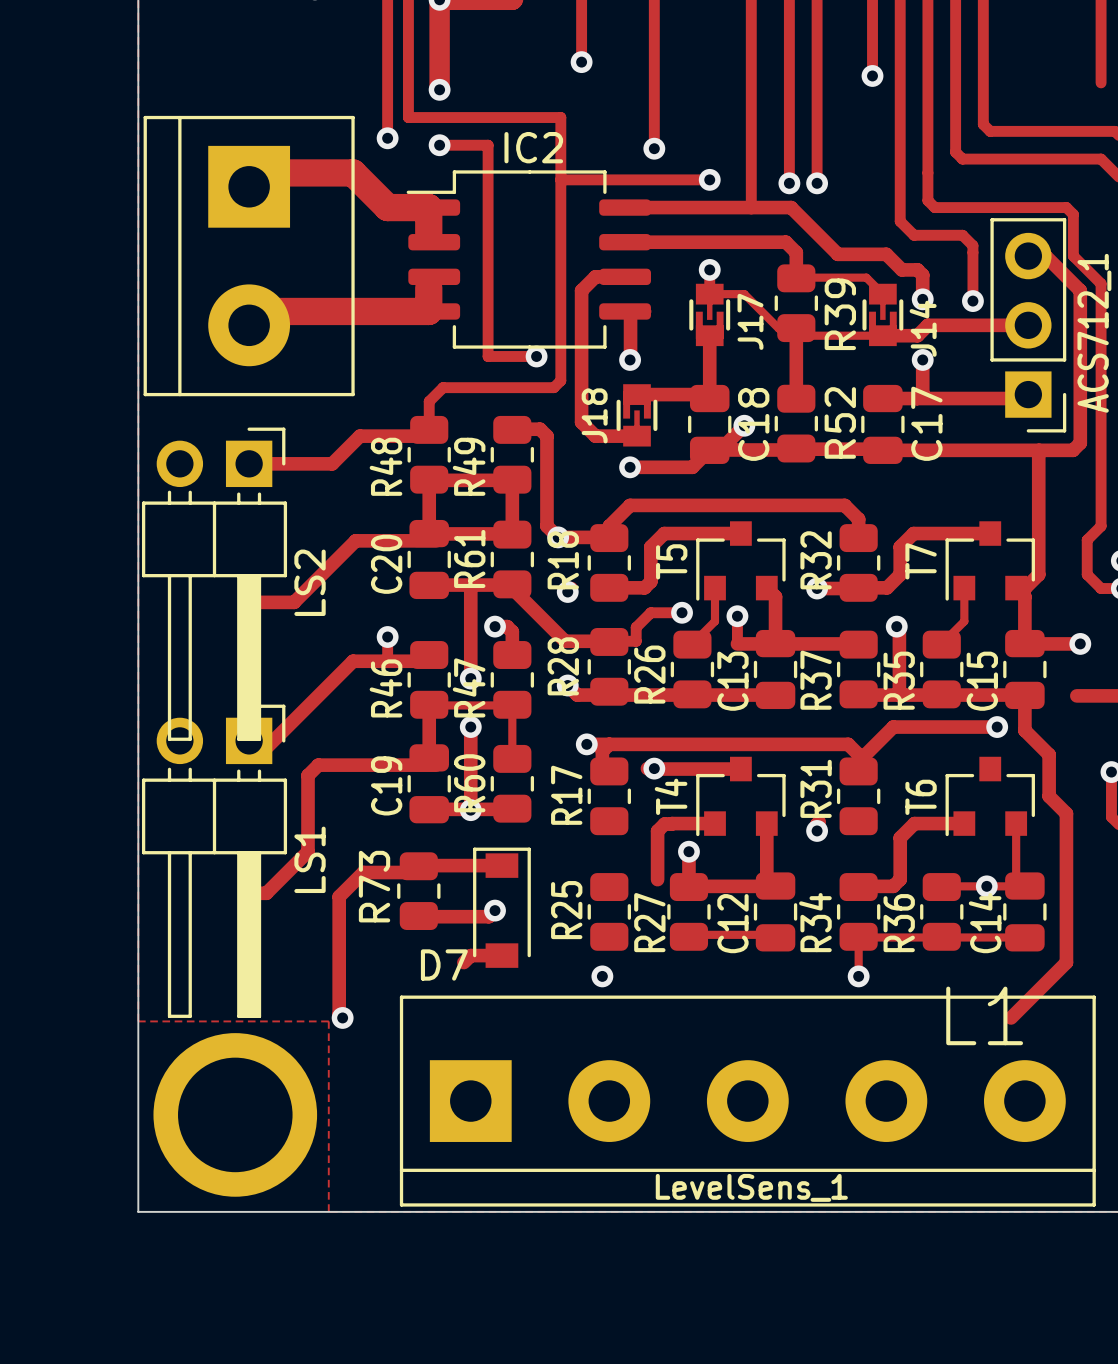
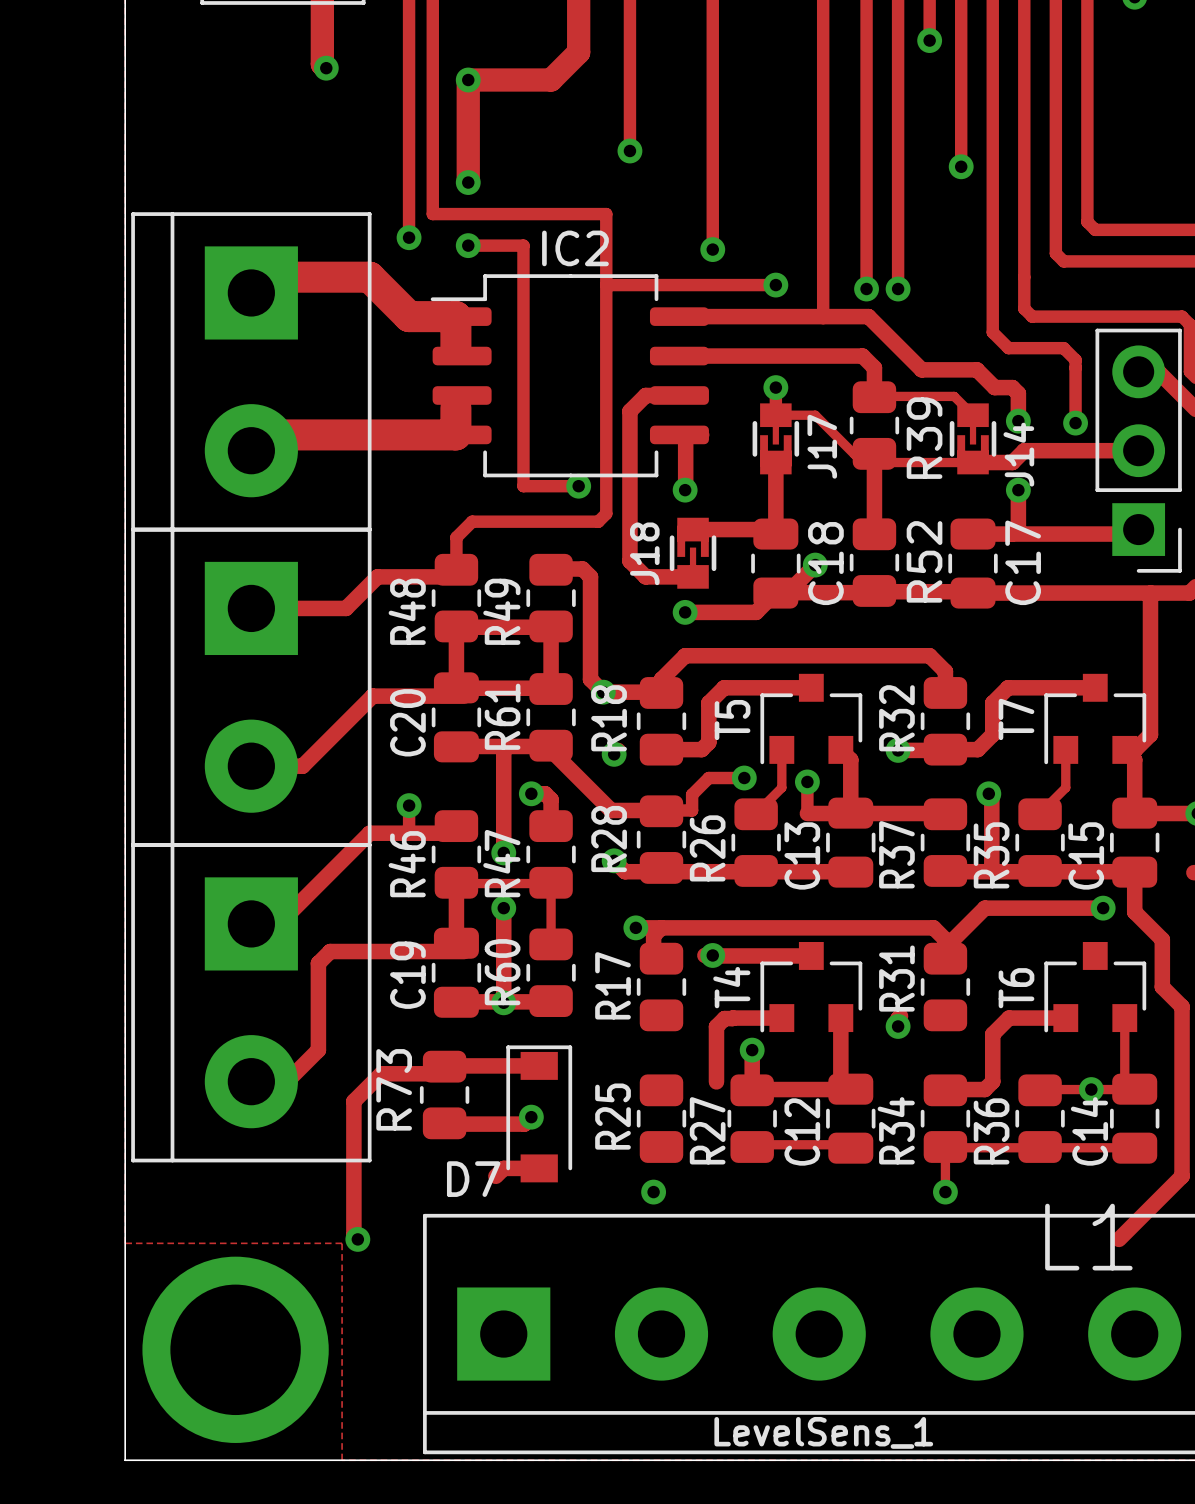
part: none -> (251, 687)
LS2: (214, 584) -> none
part: none -> (251, 1002)
LS1: (214, 861) -> none

